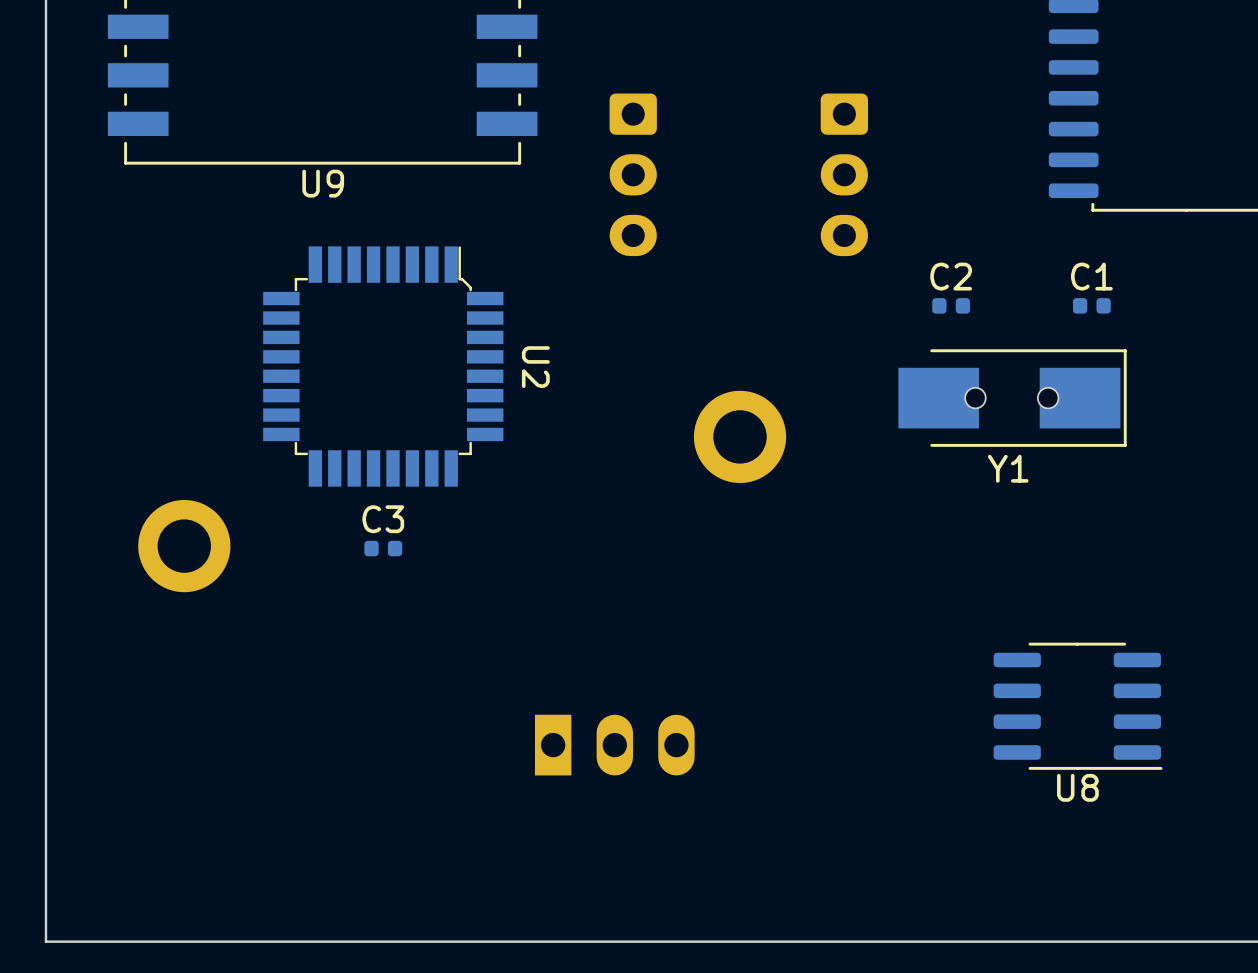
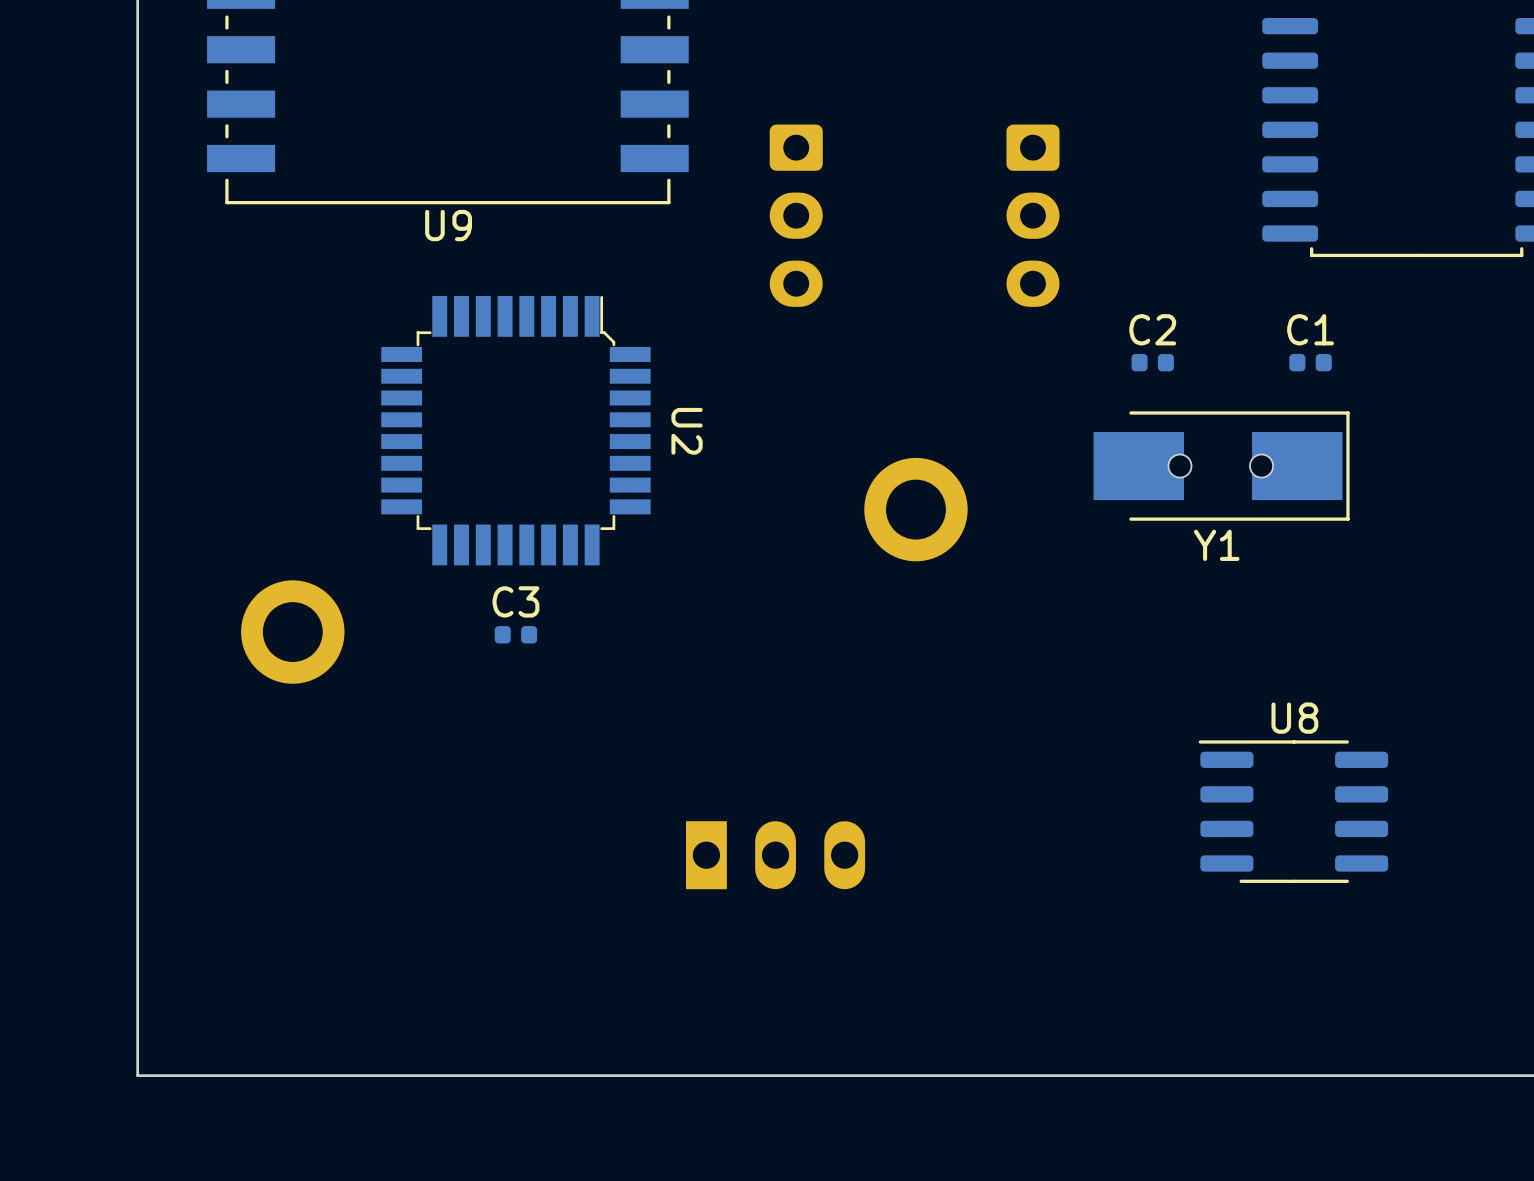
U8 rotation: 0° (1078, 706) -> 180° (1293, 811)

